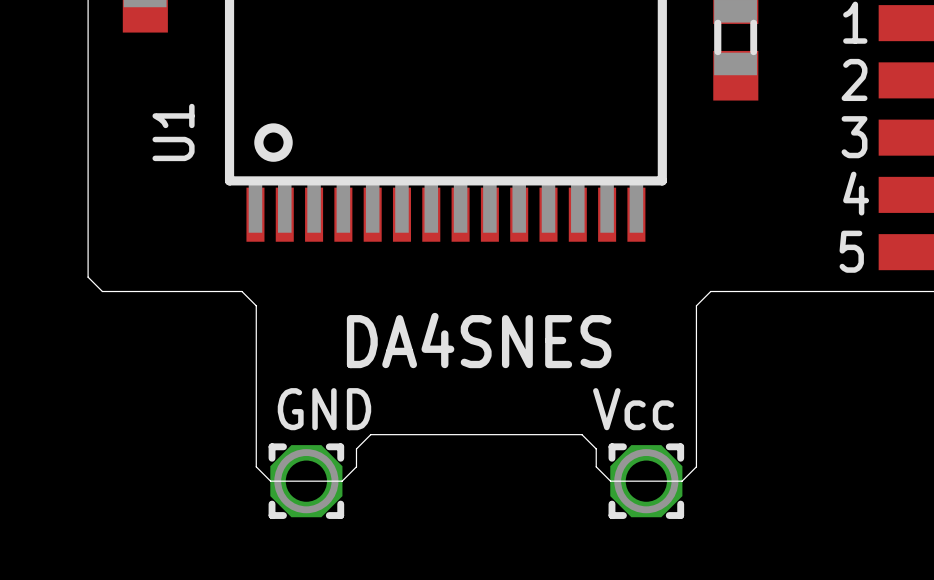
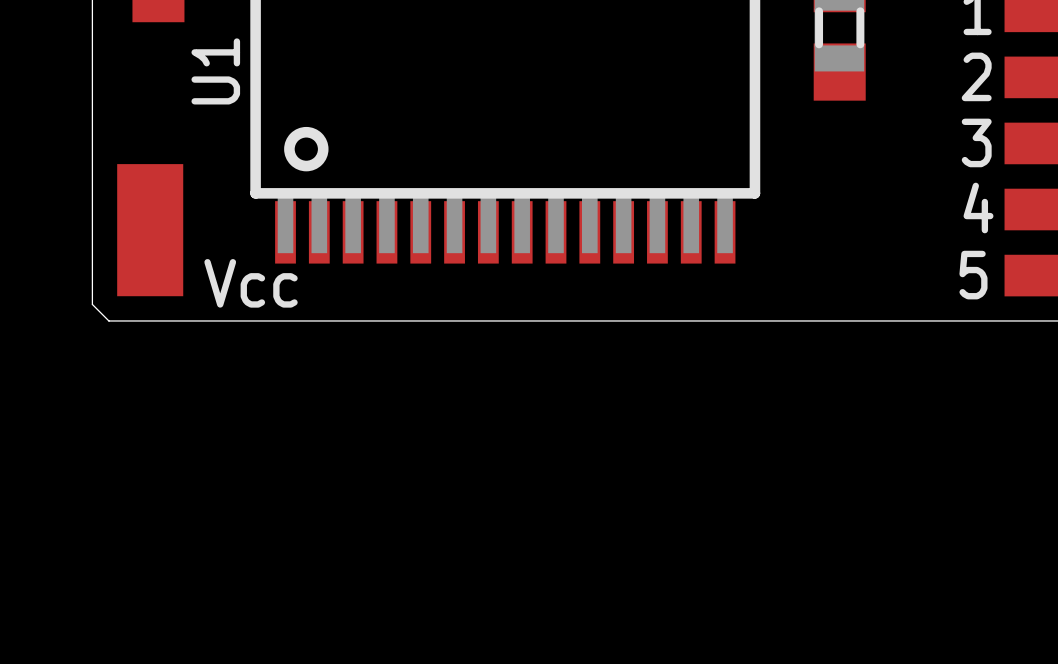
text position: U1 (173, 132) -> U1 (215, 71)
part: none -> (150, 230)
board edge: (241, 291) (256, 305) (256, 466) (270, 481) (342, 481) (356, 466) (356, 448) (370, 434) (581, 434) (596, 448) (596, 466) (610, 481) (682, 481) (696, 466) (696, 305) (710, 291) -> (269, 320) (810, 320)
text: DA4SNES (479, 340) -> none
text: GND (324, 409) -> none
text position: Vcc (633, 409) -> Vcc (251, 283)
part: (306, 481) -> none
part: (646, 481) -> none

